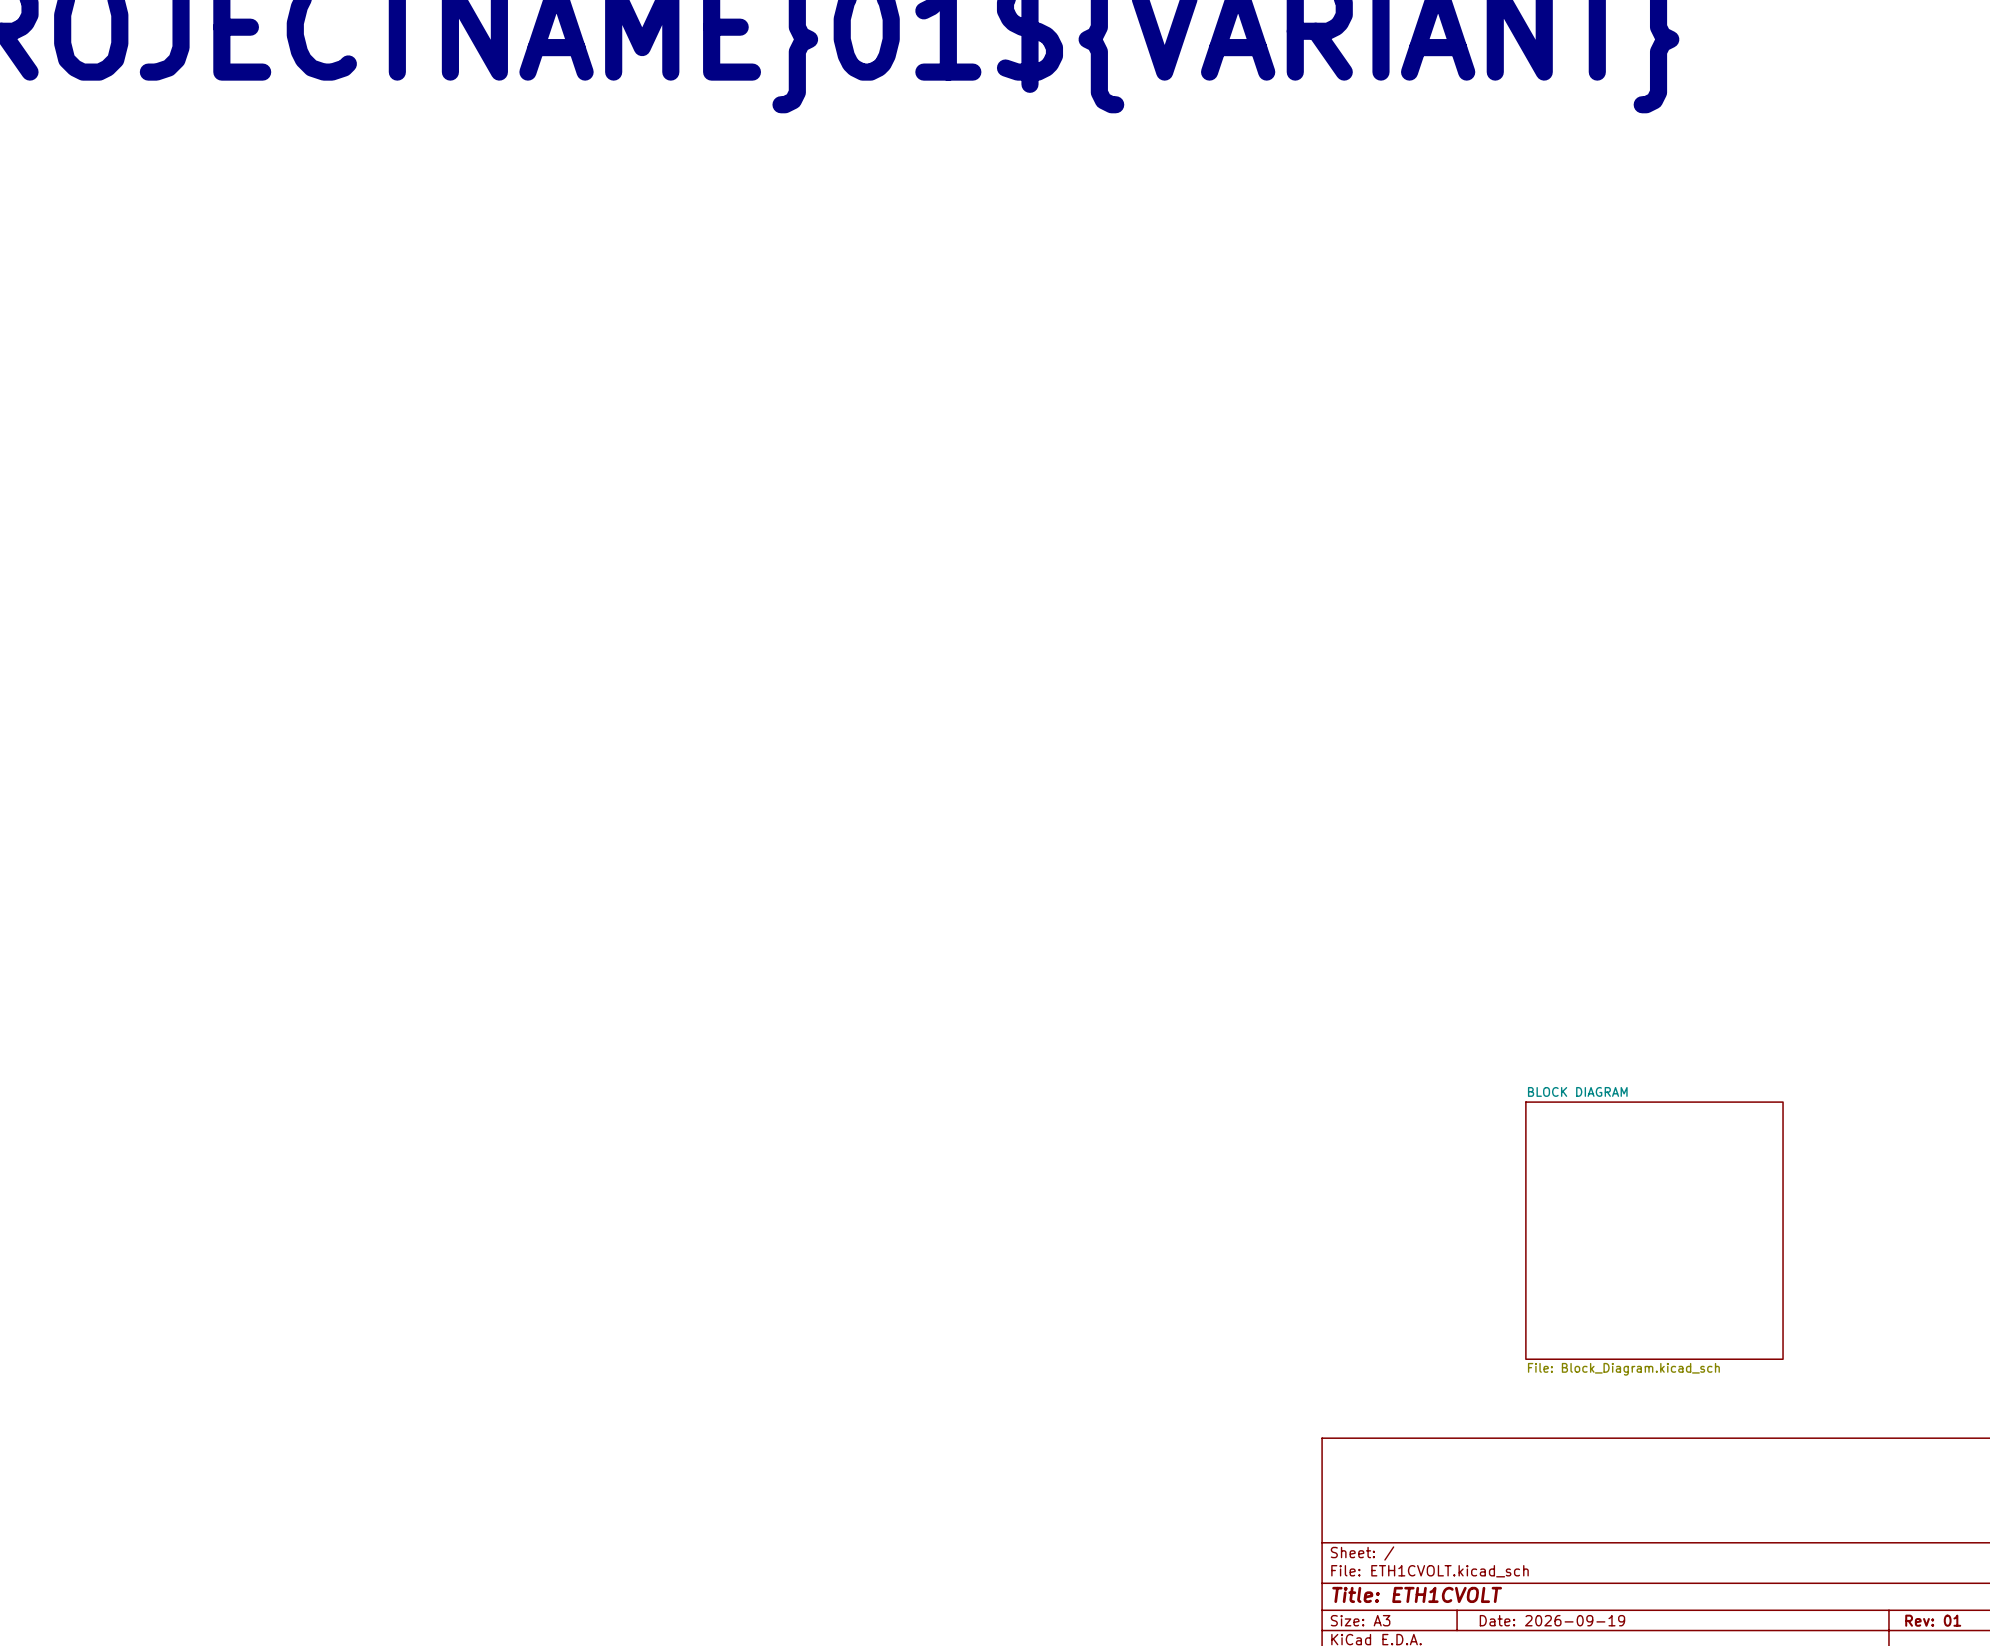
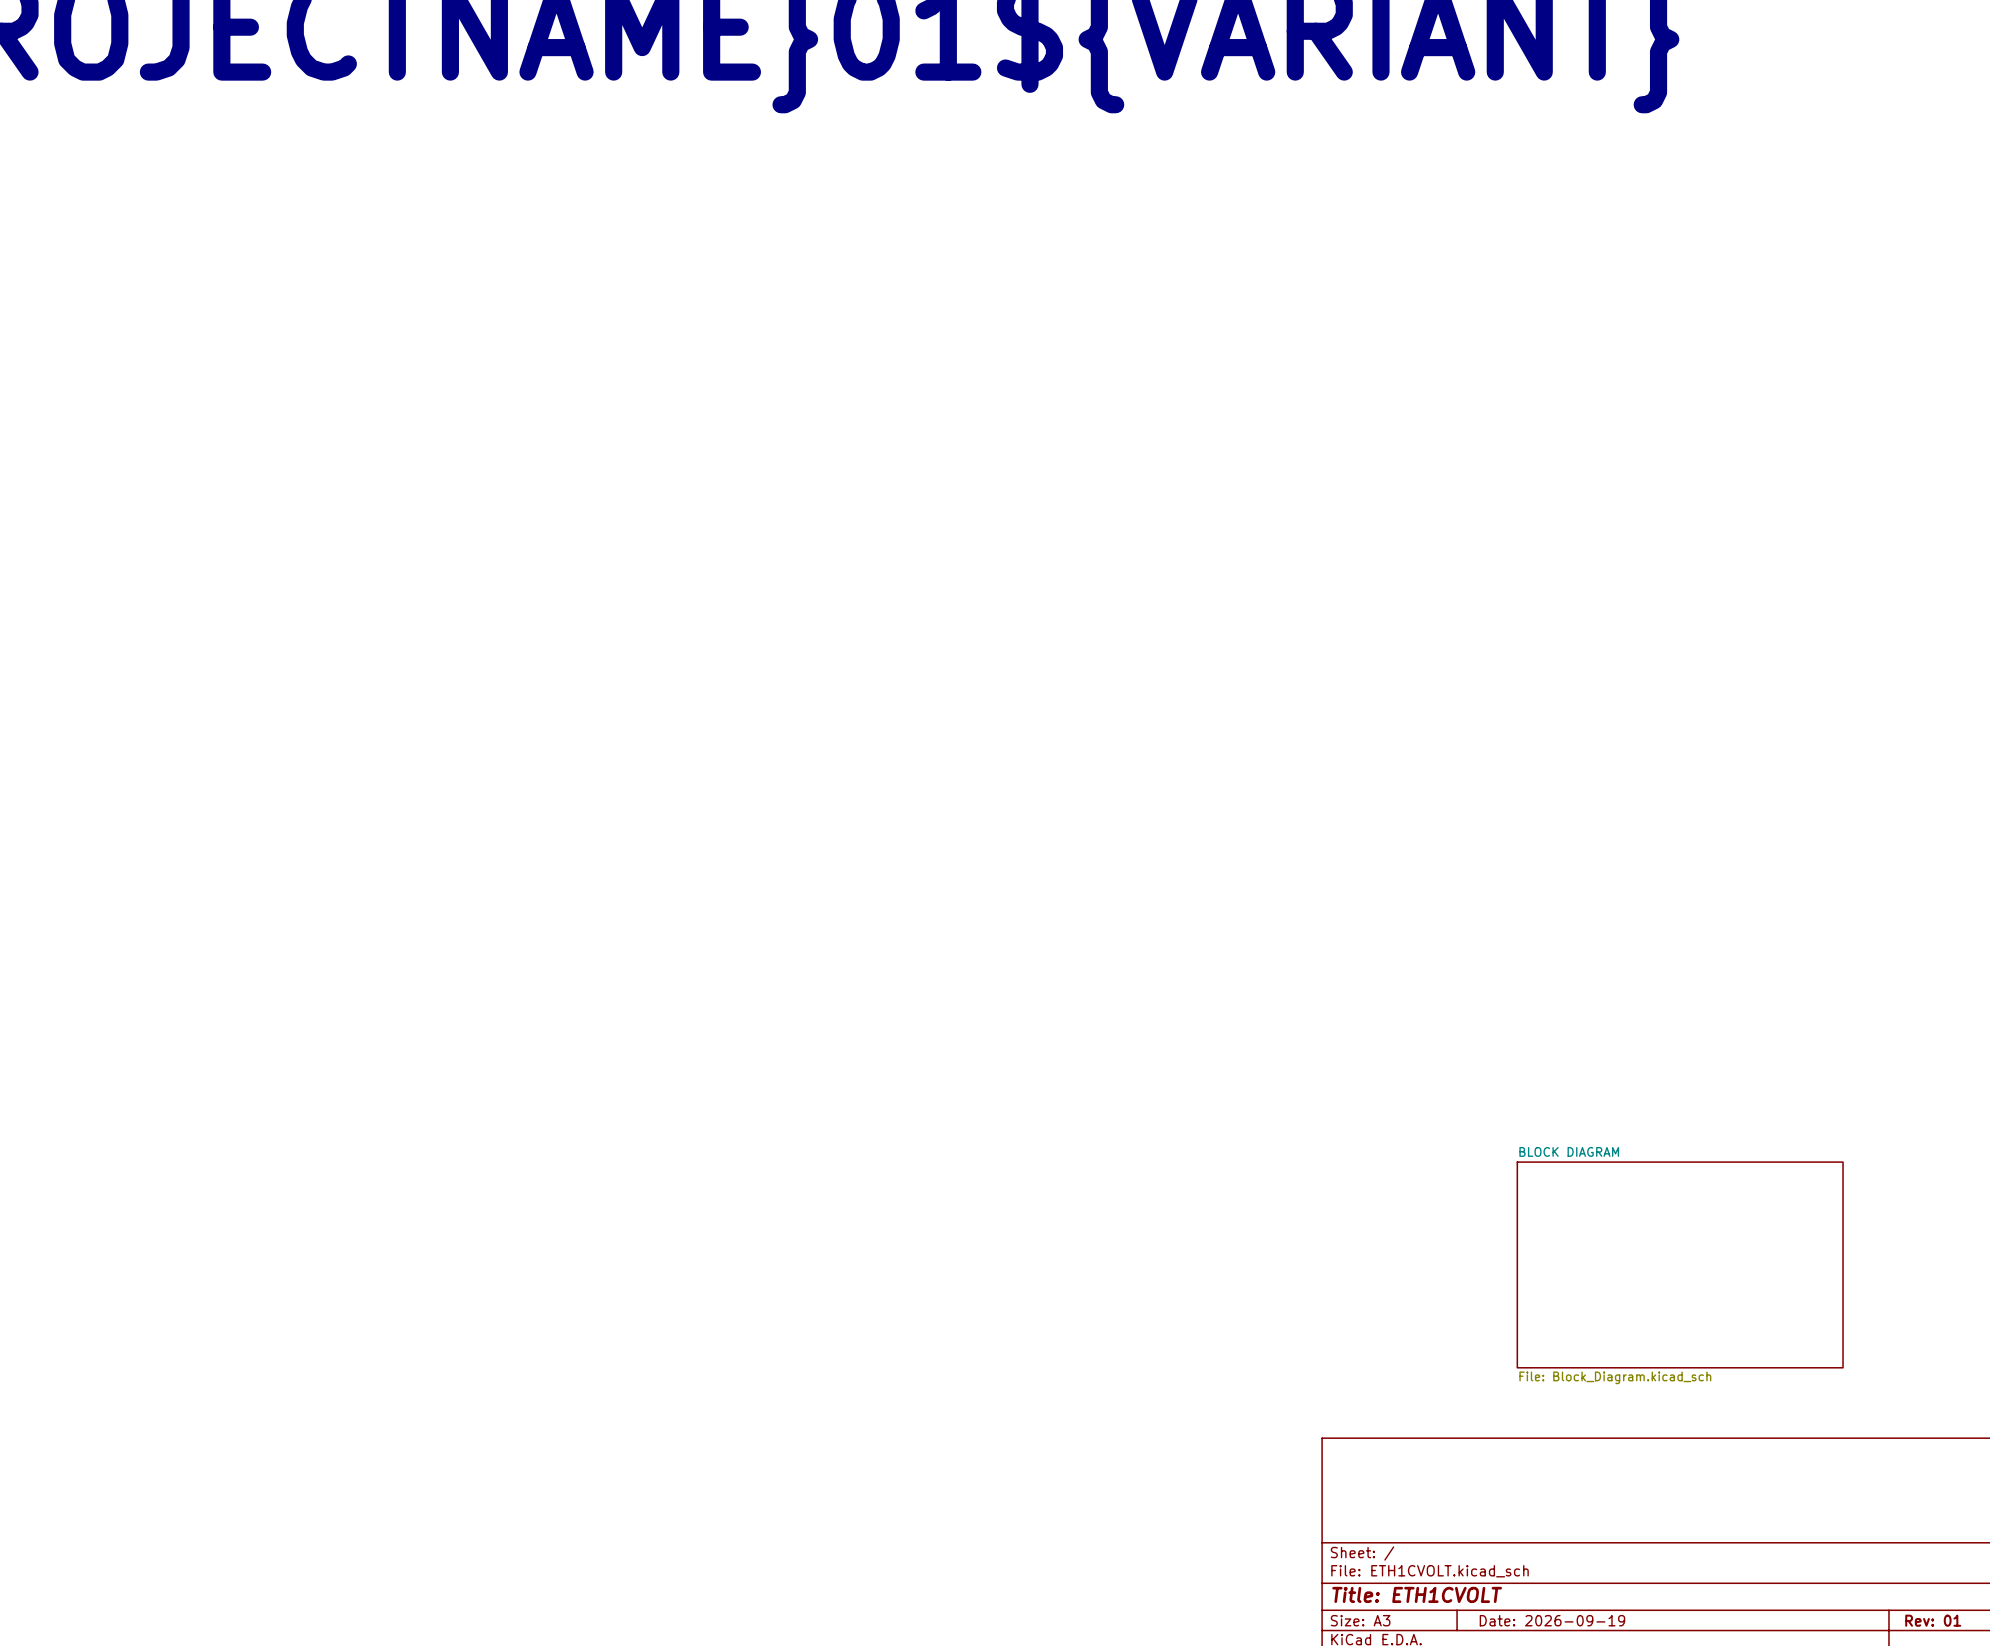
sheet BLOCK DIAGRAM: File: Block_Diagram.kicad_sch (1654, 1230) -> none
sheet BLOCK DIAGRAM: none -> File: Block_Diagram.kicad_sch (1680, 1264)

